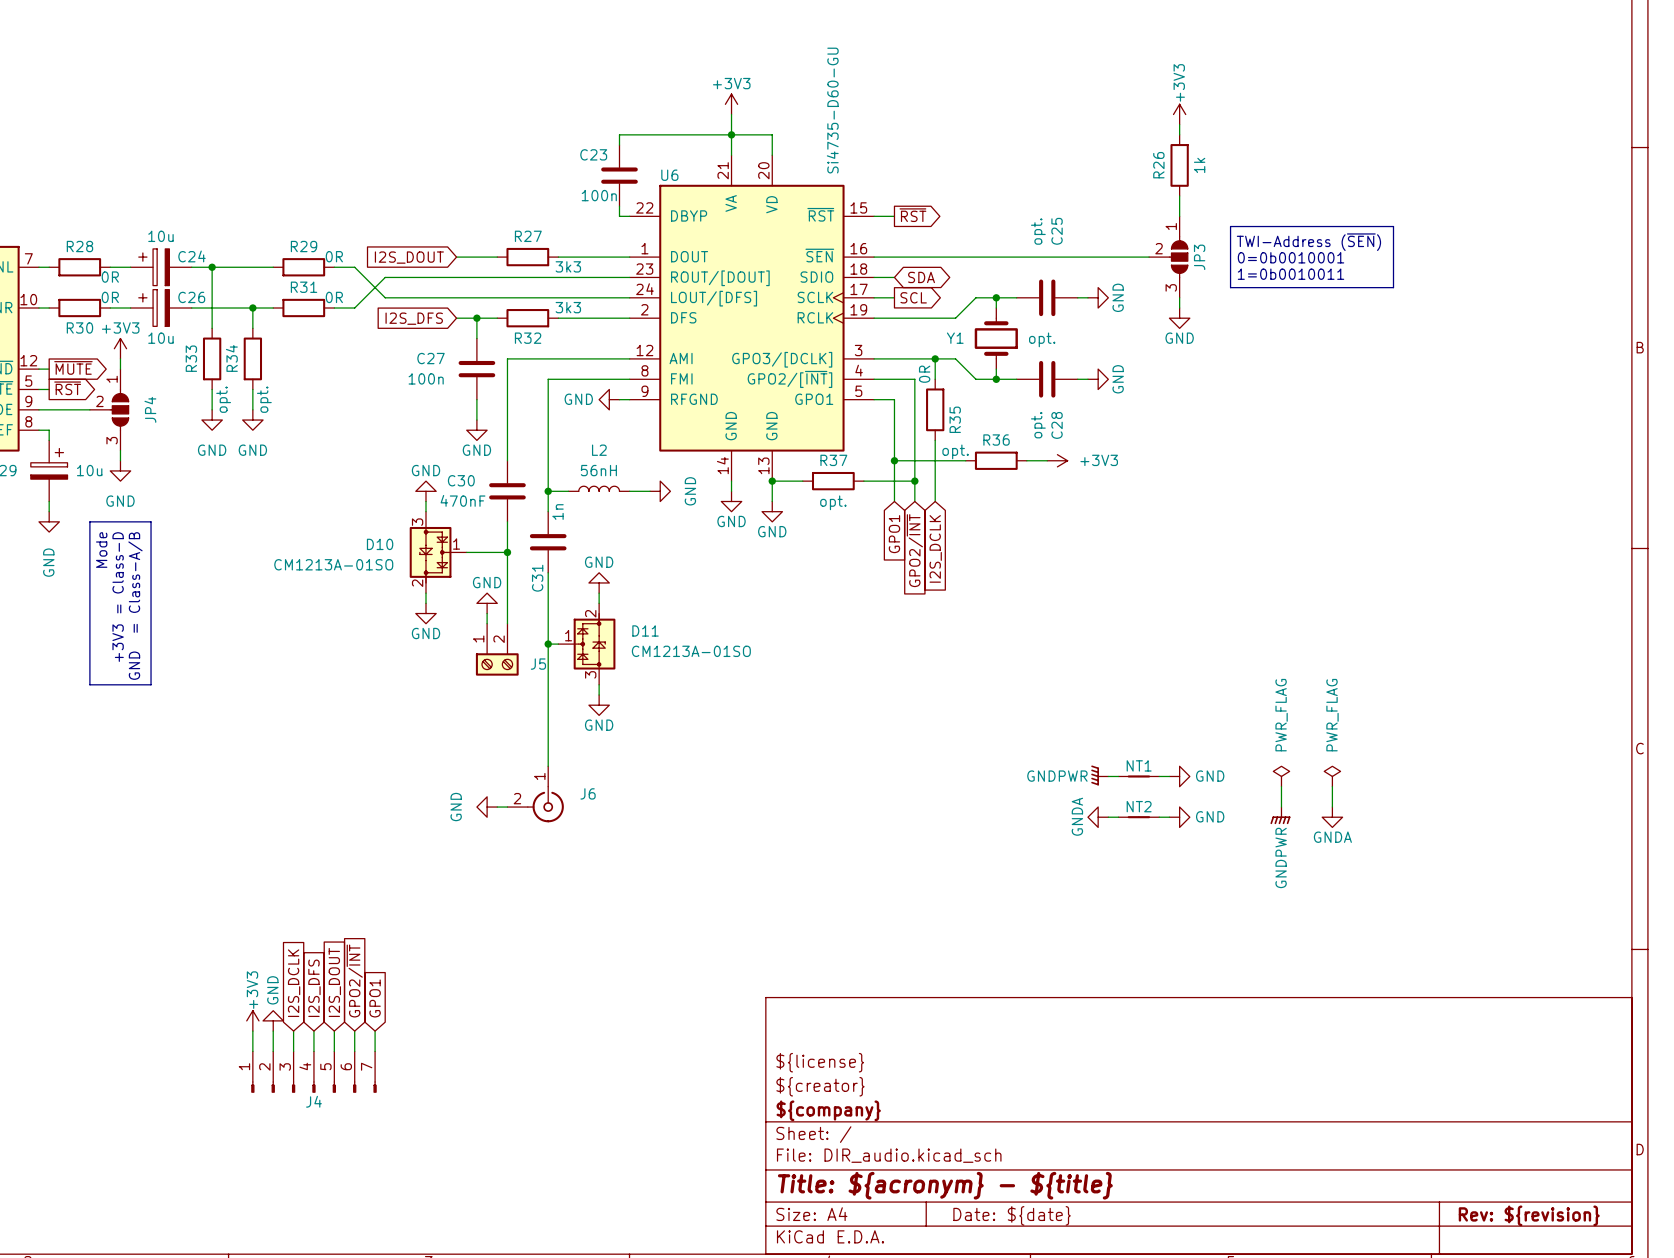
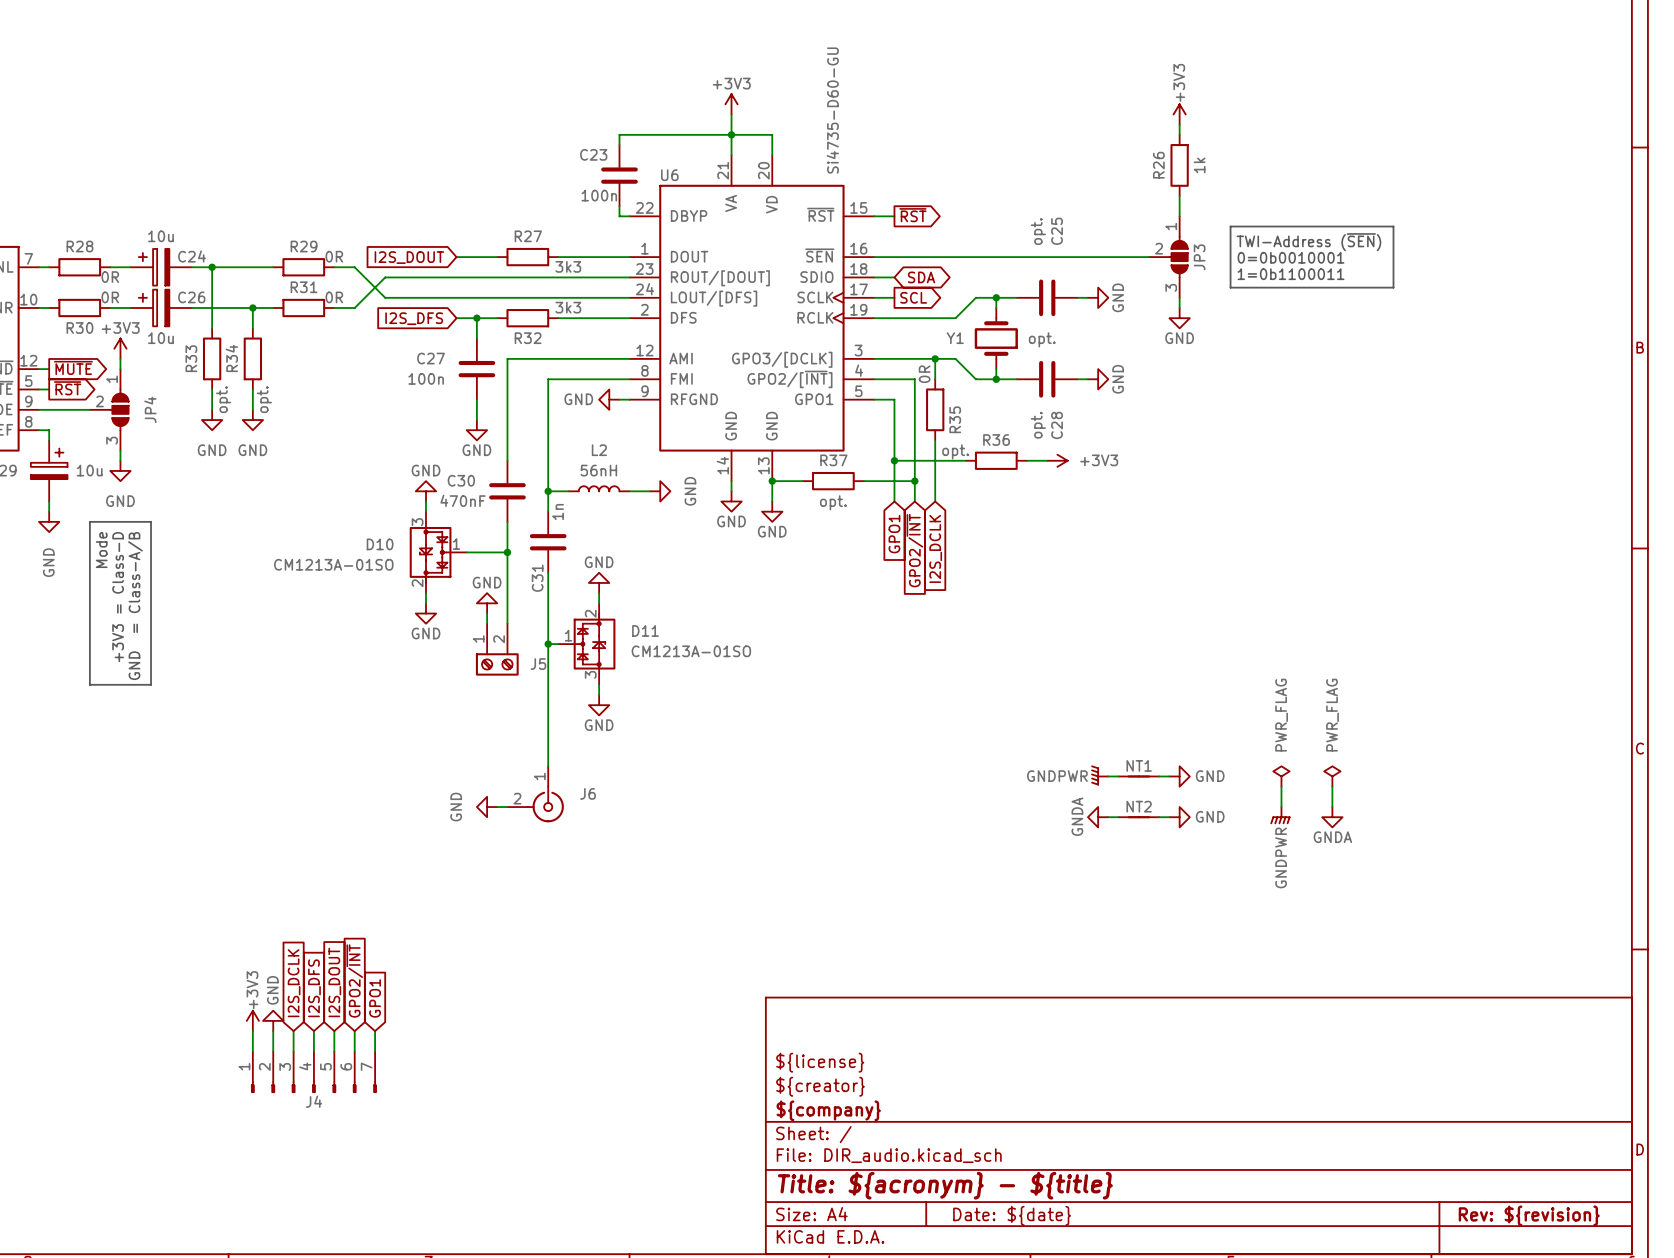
text: 1=0b0010011 (1291, 274) -> 1=0b1100011 (1291, 274)

